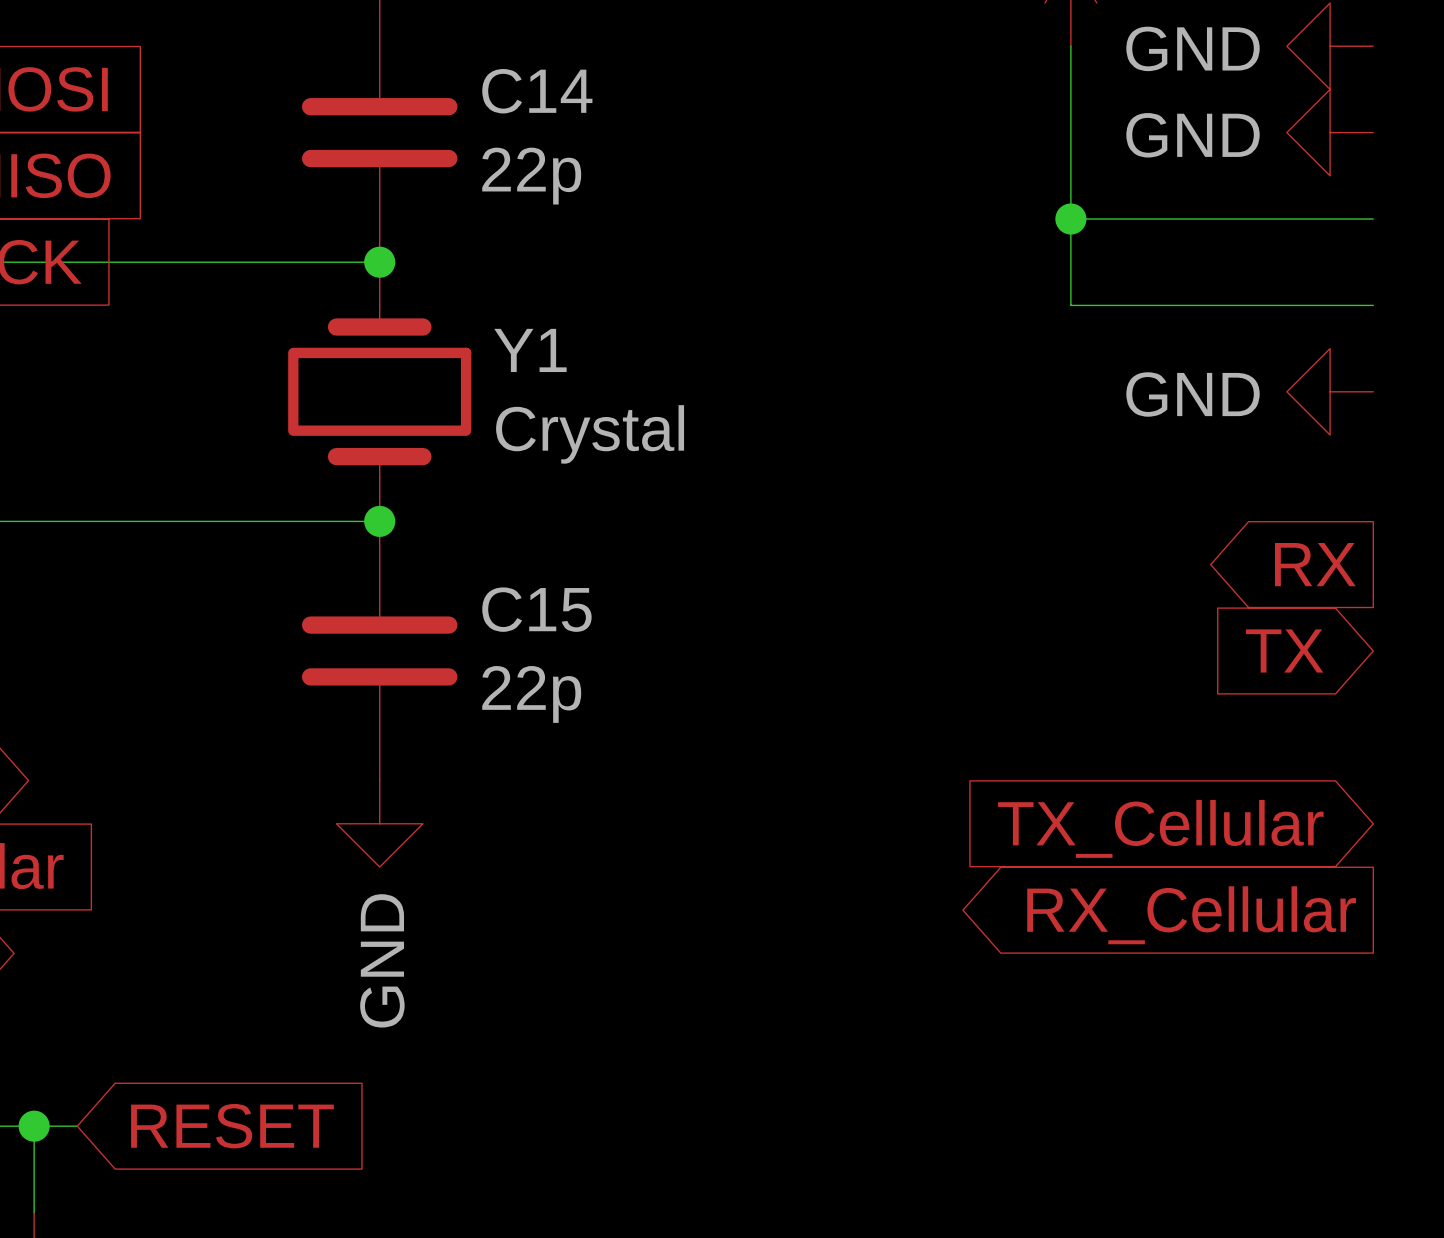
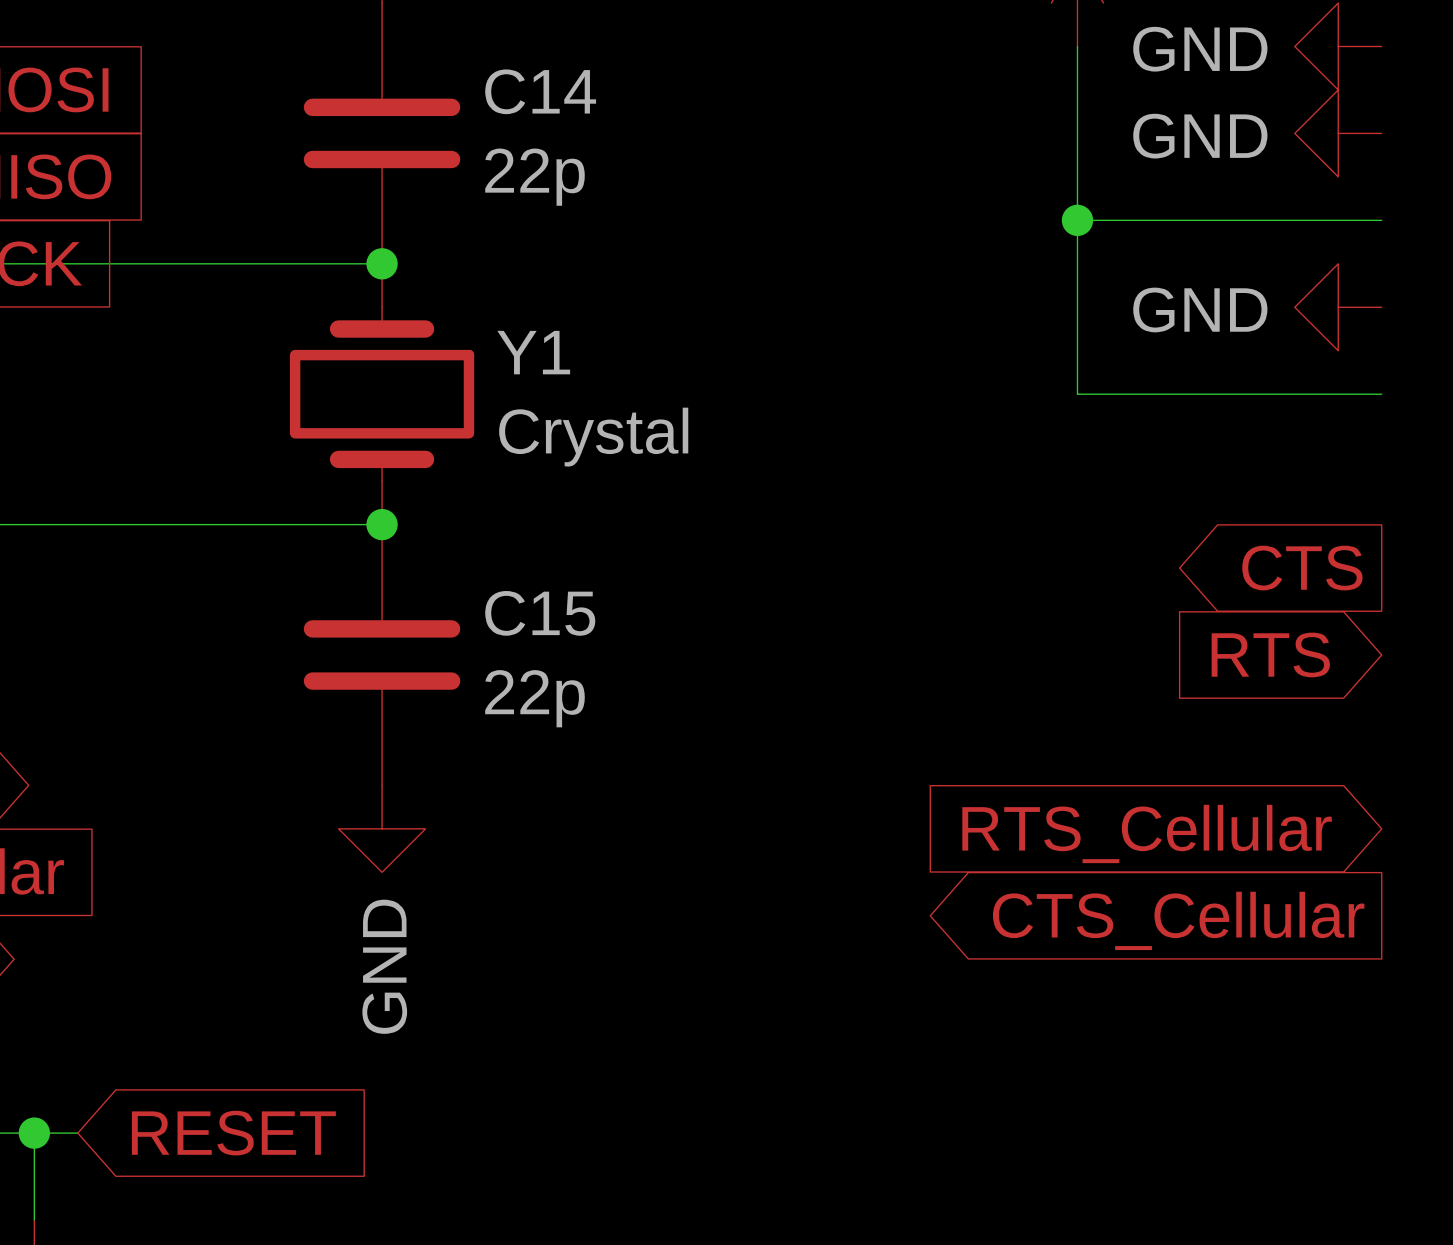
wire: (1070, 305) (1373, 305) -> (1077, 307) (1077, 394) (1381, 394)
power symbol position: GND (1330, 391) -> GND (1338, 307)
global label: RX (1315, 564) -> CTS (1302, 568)
global label: TX (1284, 650) -> RTS (1270, 654)
global label: TX_Cellular (1160, 828) -> RTS_Cellular (1147, 833)
global label: RX_Cellular (1191, 915) -> CTS_Cellular (1178, 920)

